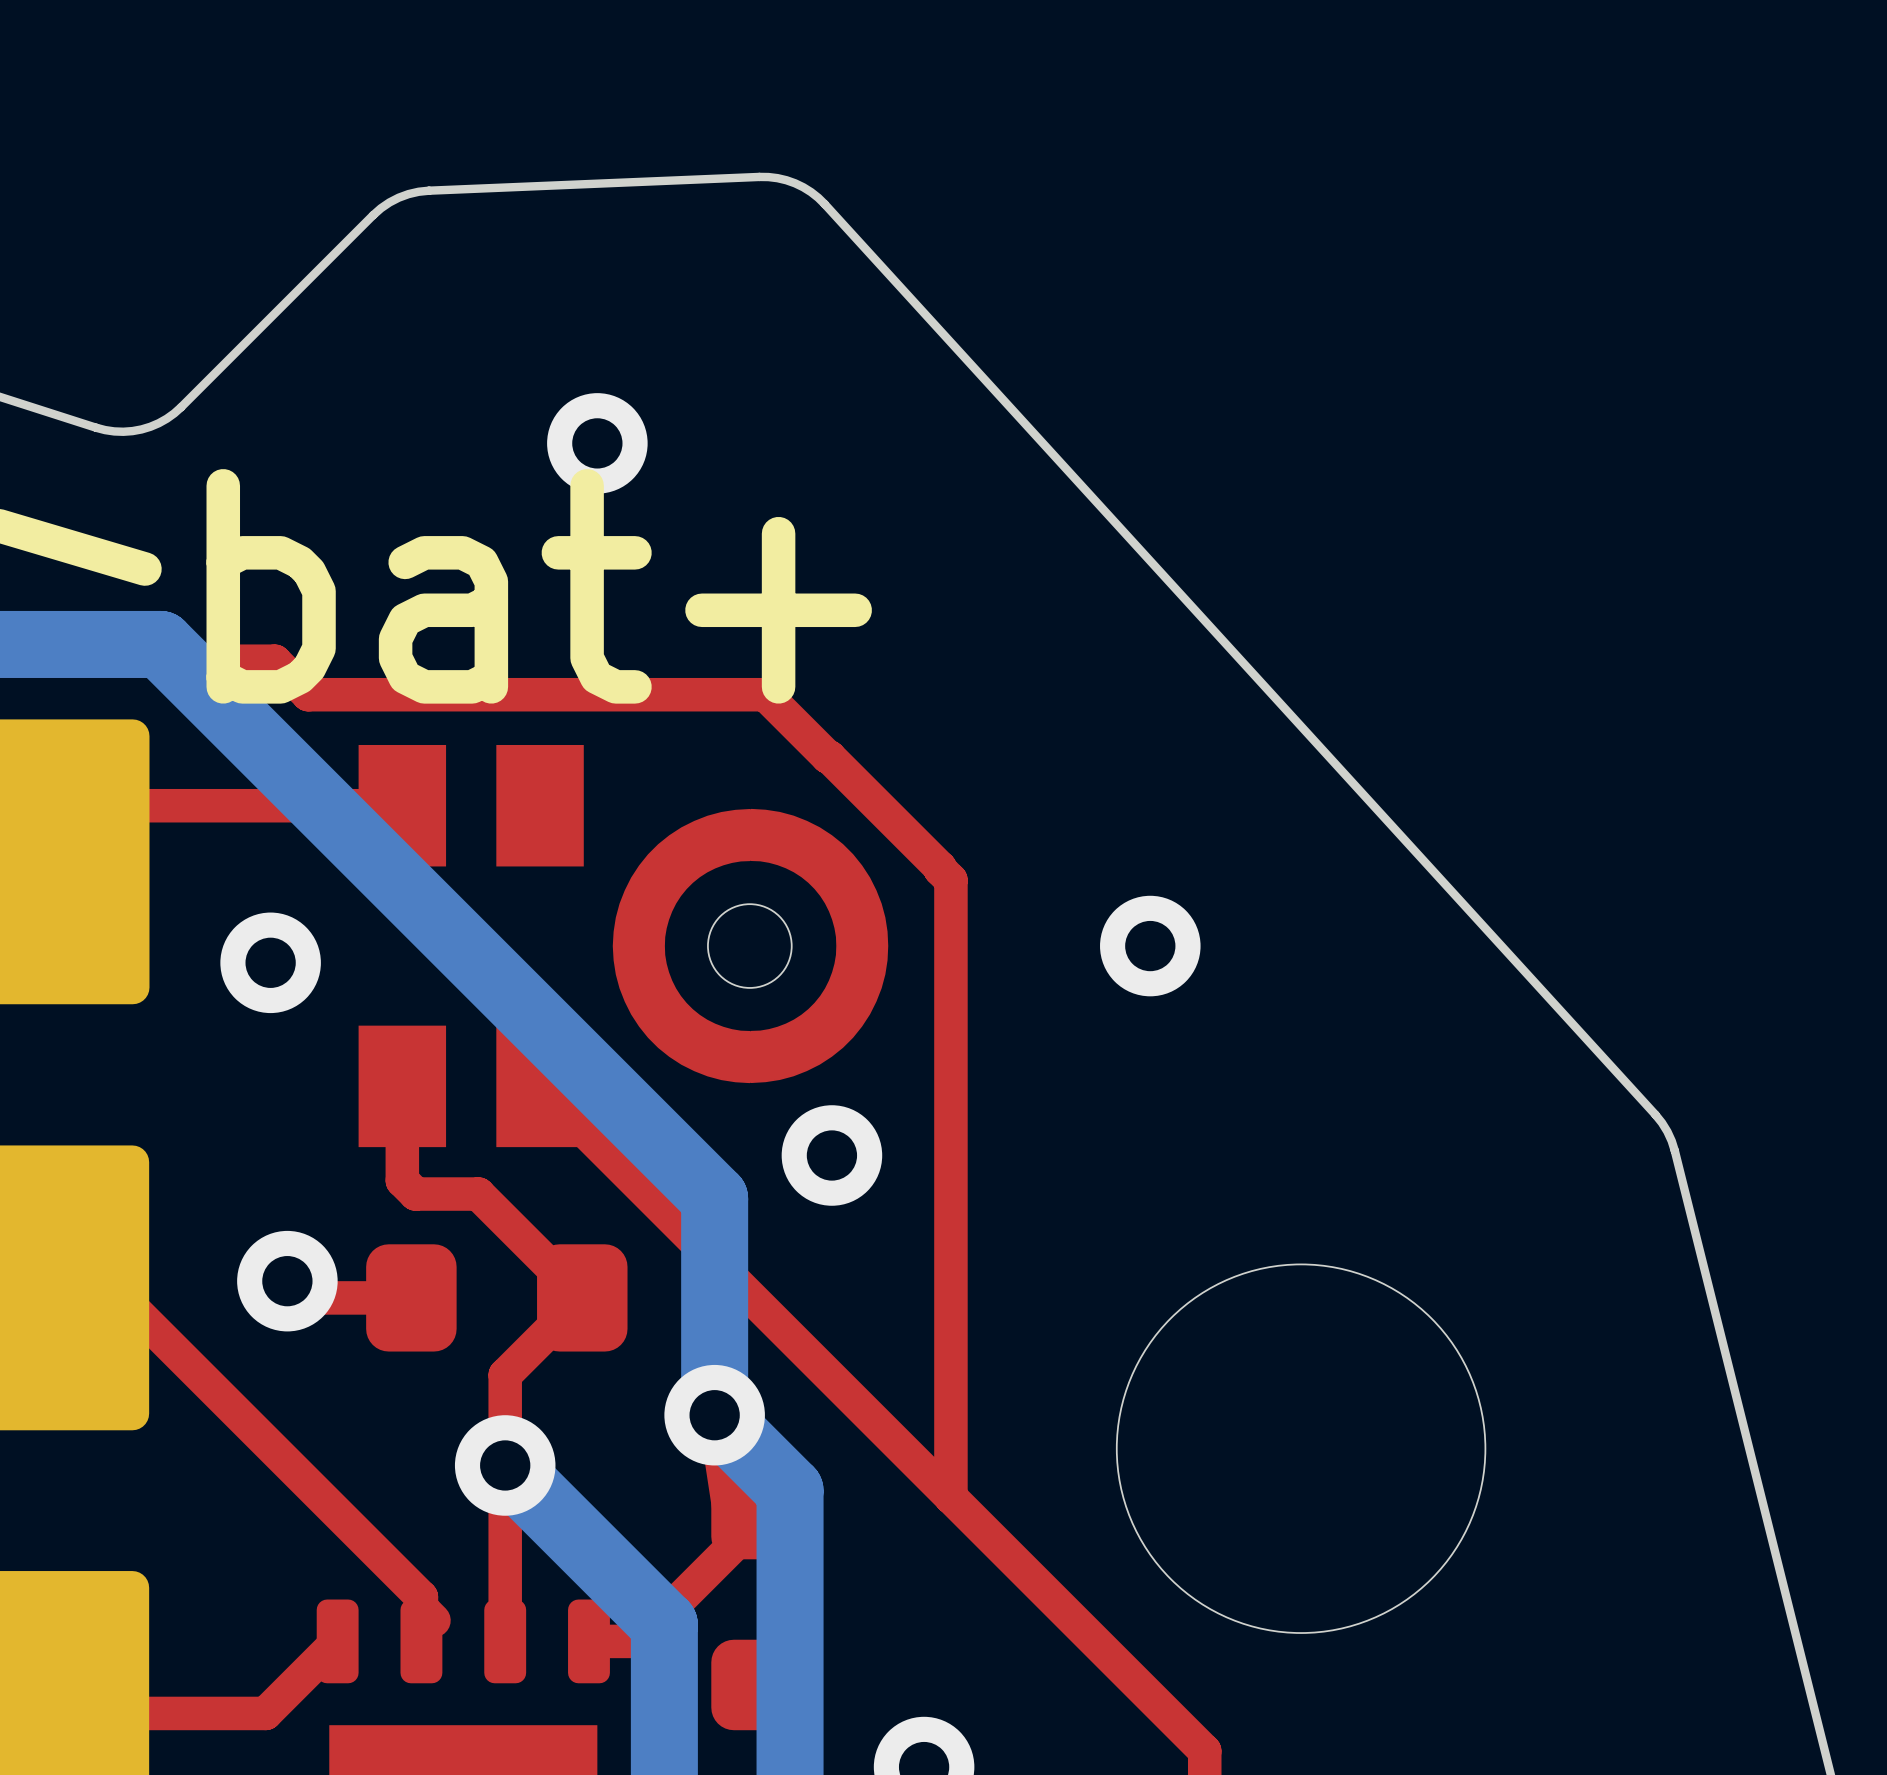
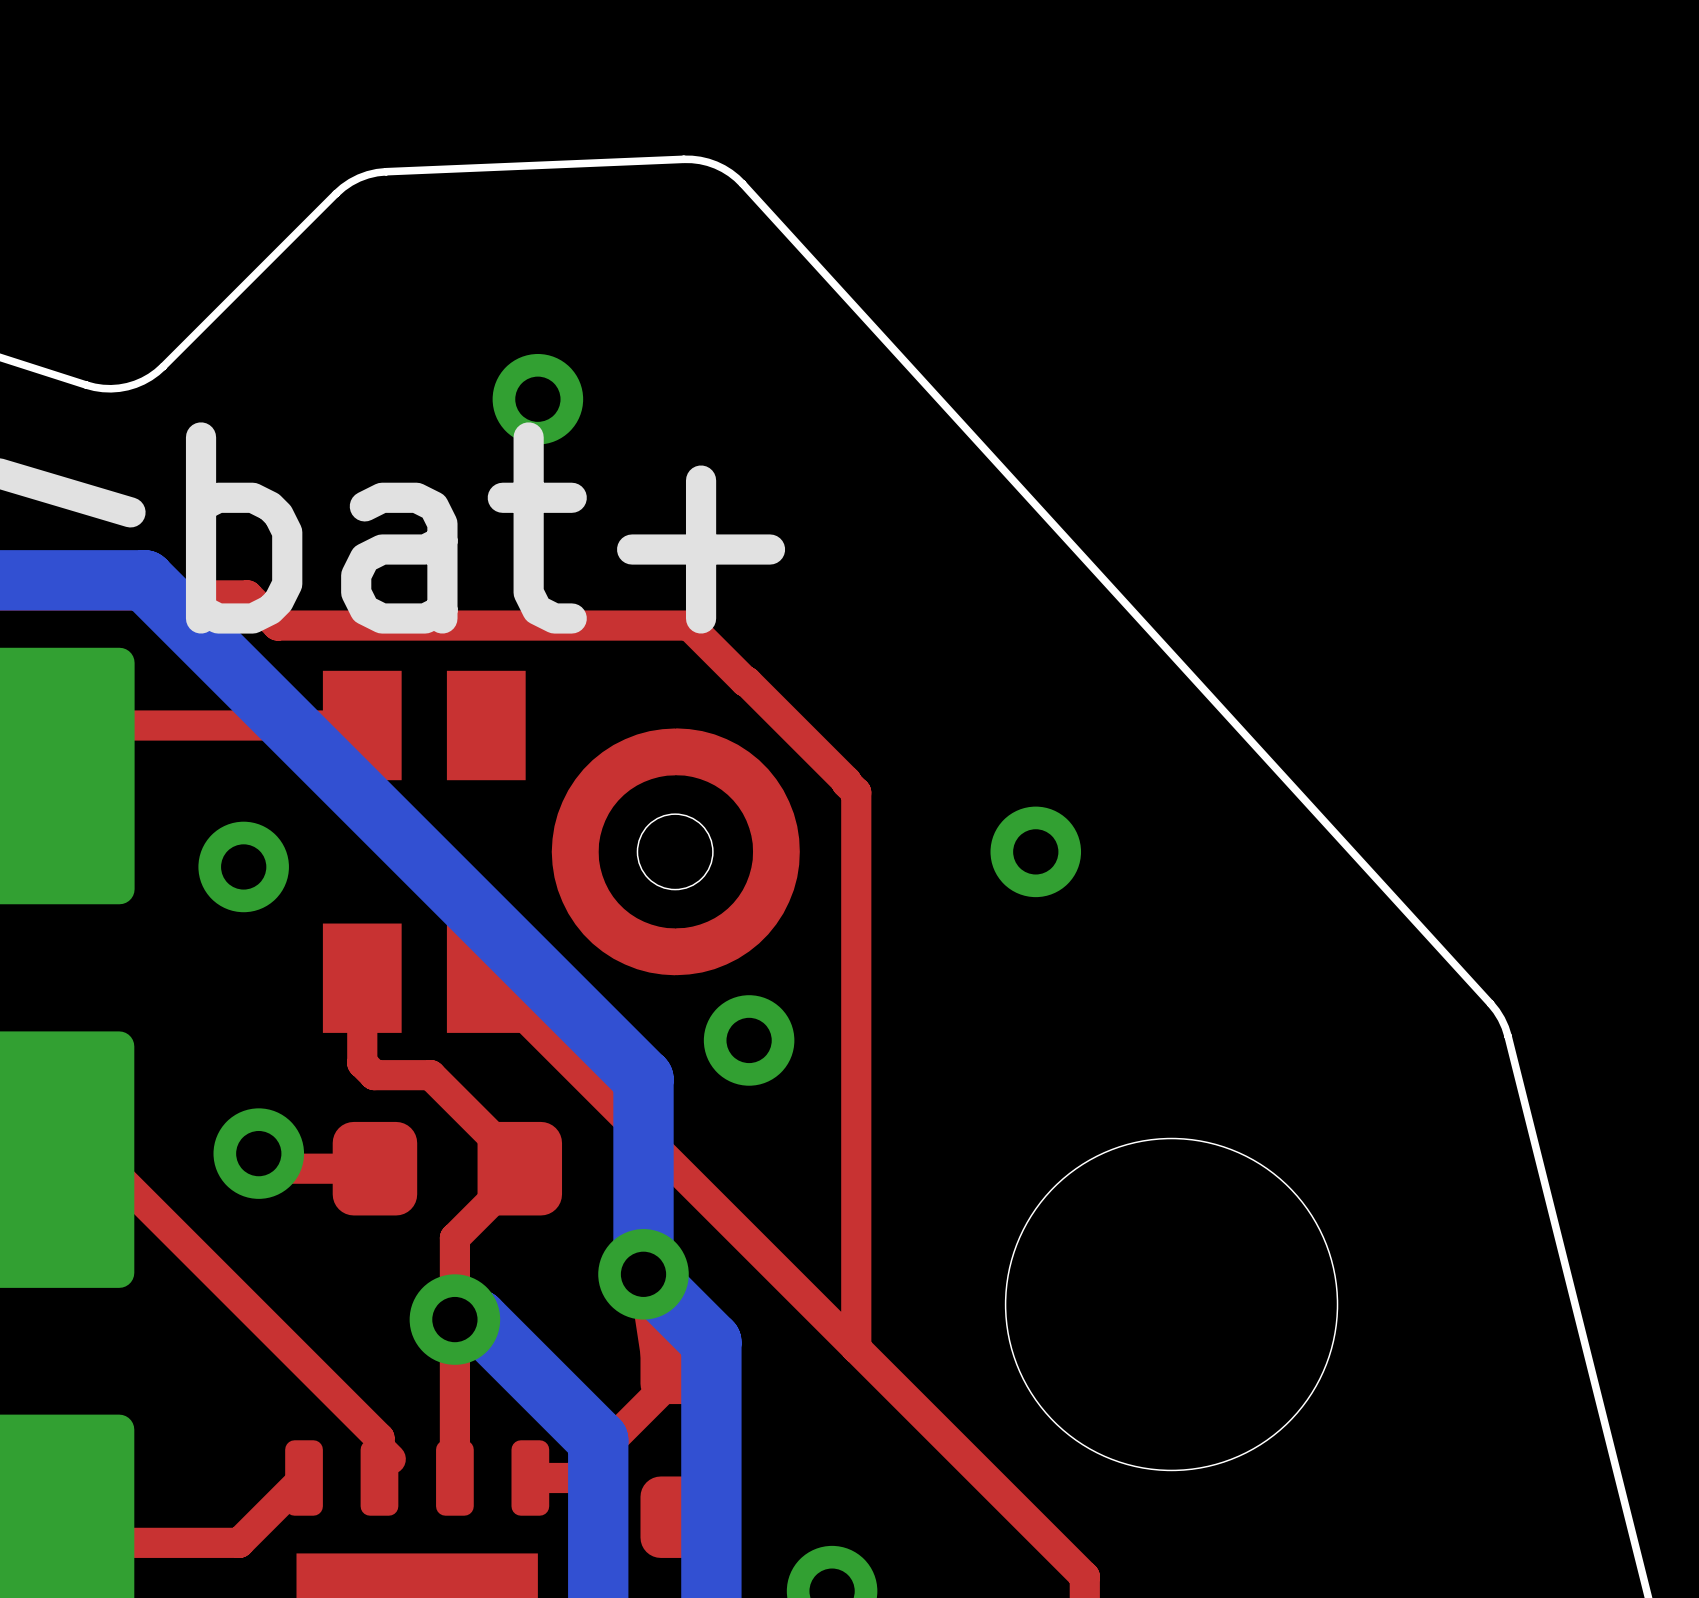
part footprint: [366, 1244, 628, 1352] -> [332, 1121, 563, 1216]
bottom track: (505, 1465) (664, 1624) -> (454, 1319) (477, 1319) (598, 1440) (598, 1462)

